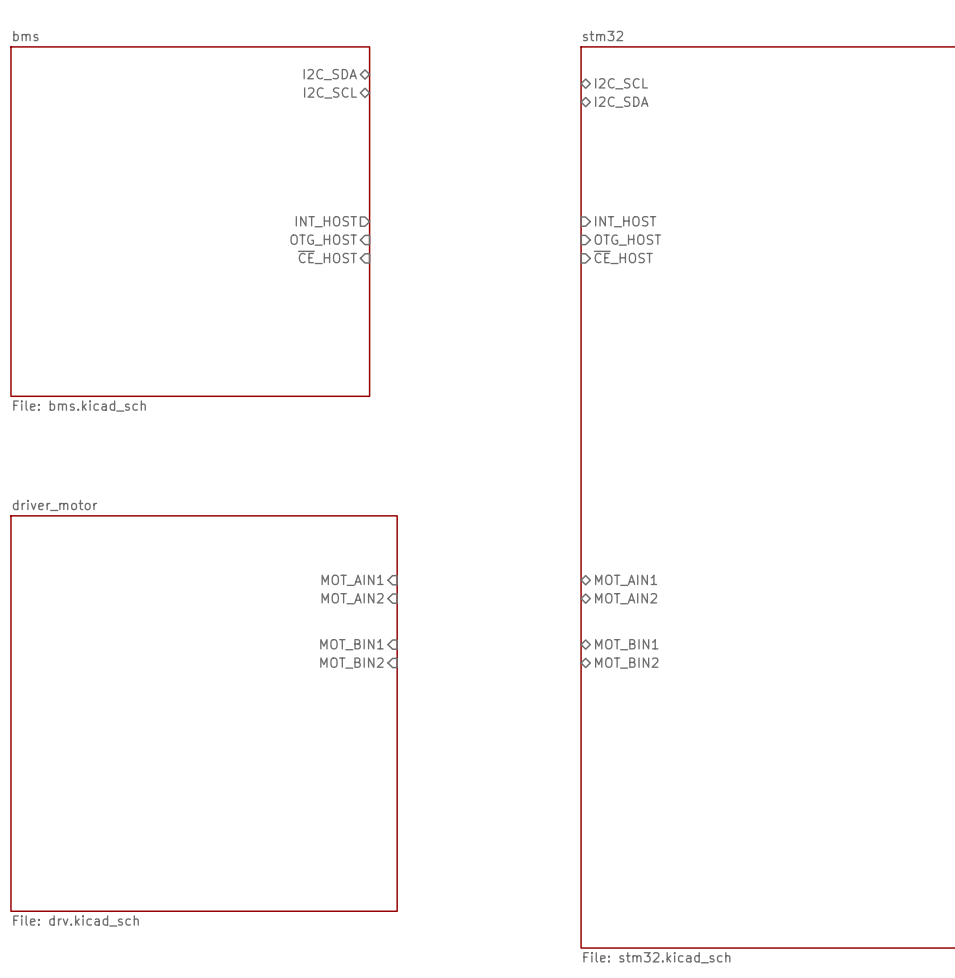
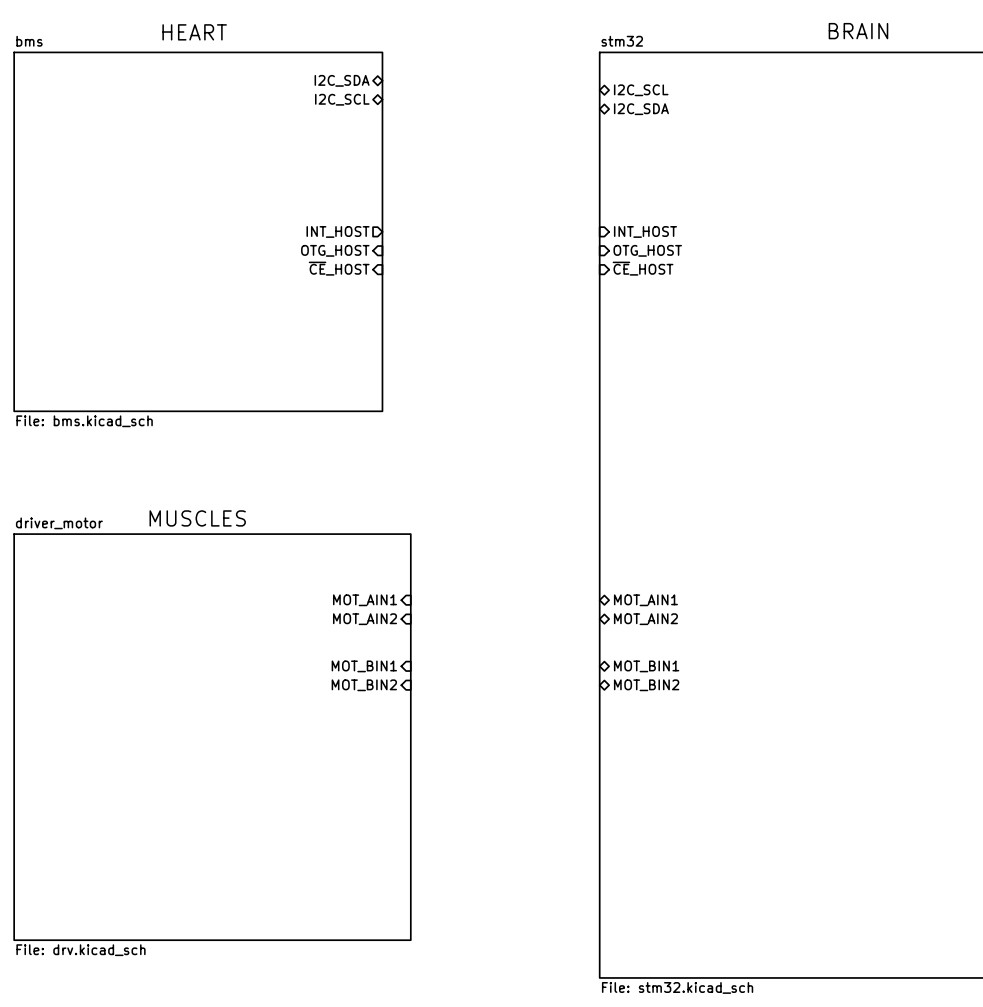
text: none -> BRAIN (858, 31)
text: none -> HEART (194, 32)
text: none -> MUSCLES (197, 518)

